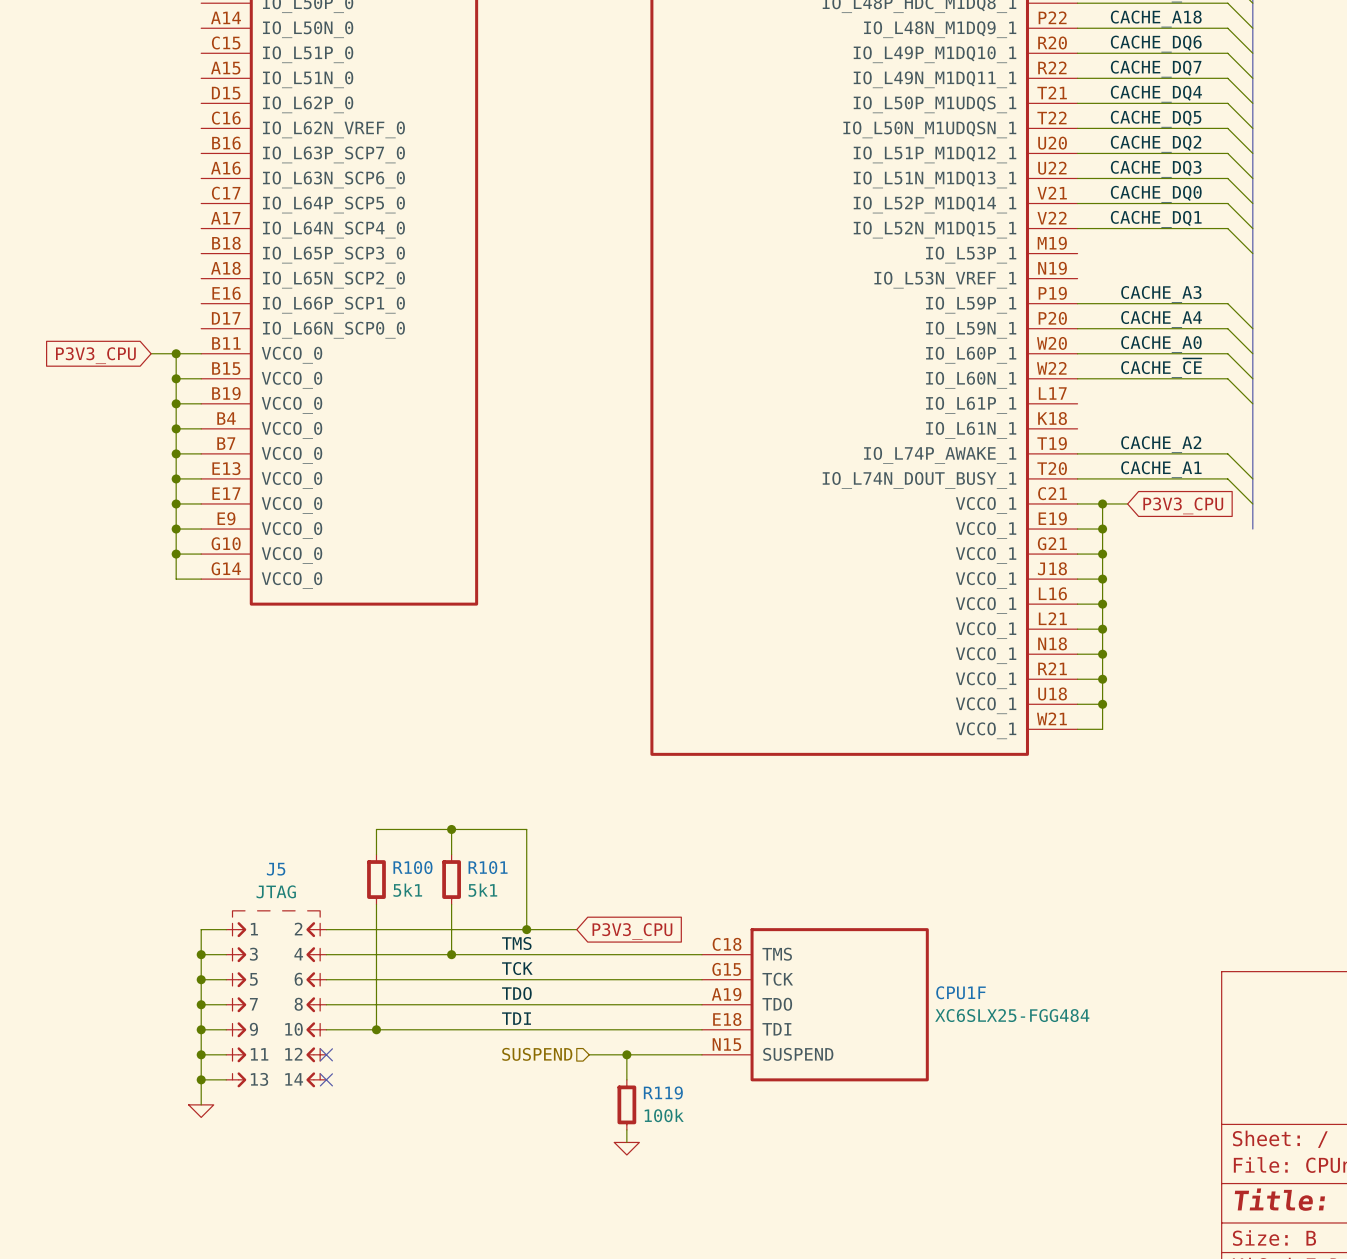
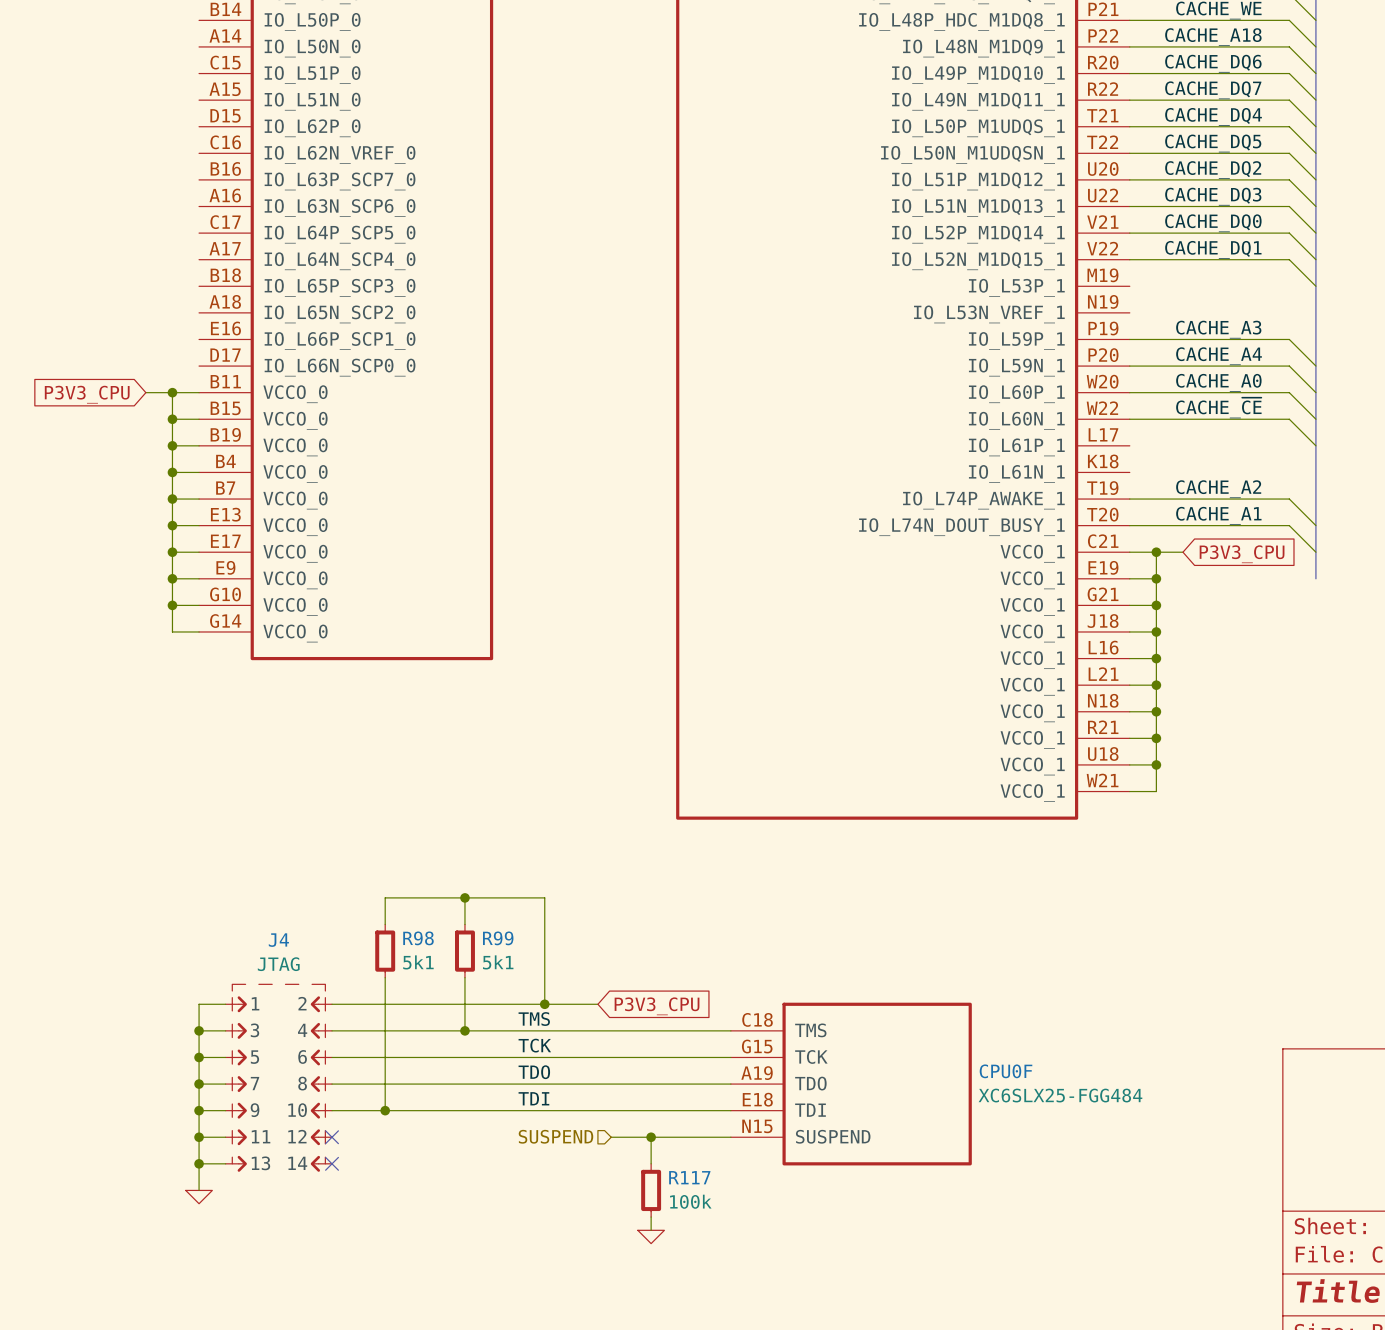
R100 name: R100 (412, 867) -> R98 (418, 938)
R101 name: R101 (488, 867) -> R99 (498, 938)
J5 name: J5 (276, 869) -> J4 (278, 940)
CPU1F name: CPU1F (961, 992) -> CPU0F (1006, 1071)
R119 name: R119 (663, 1092) -> R117 (689, 1177)

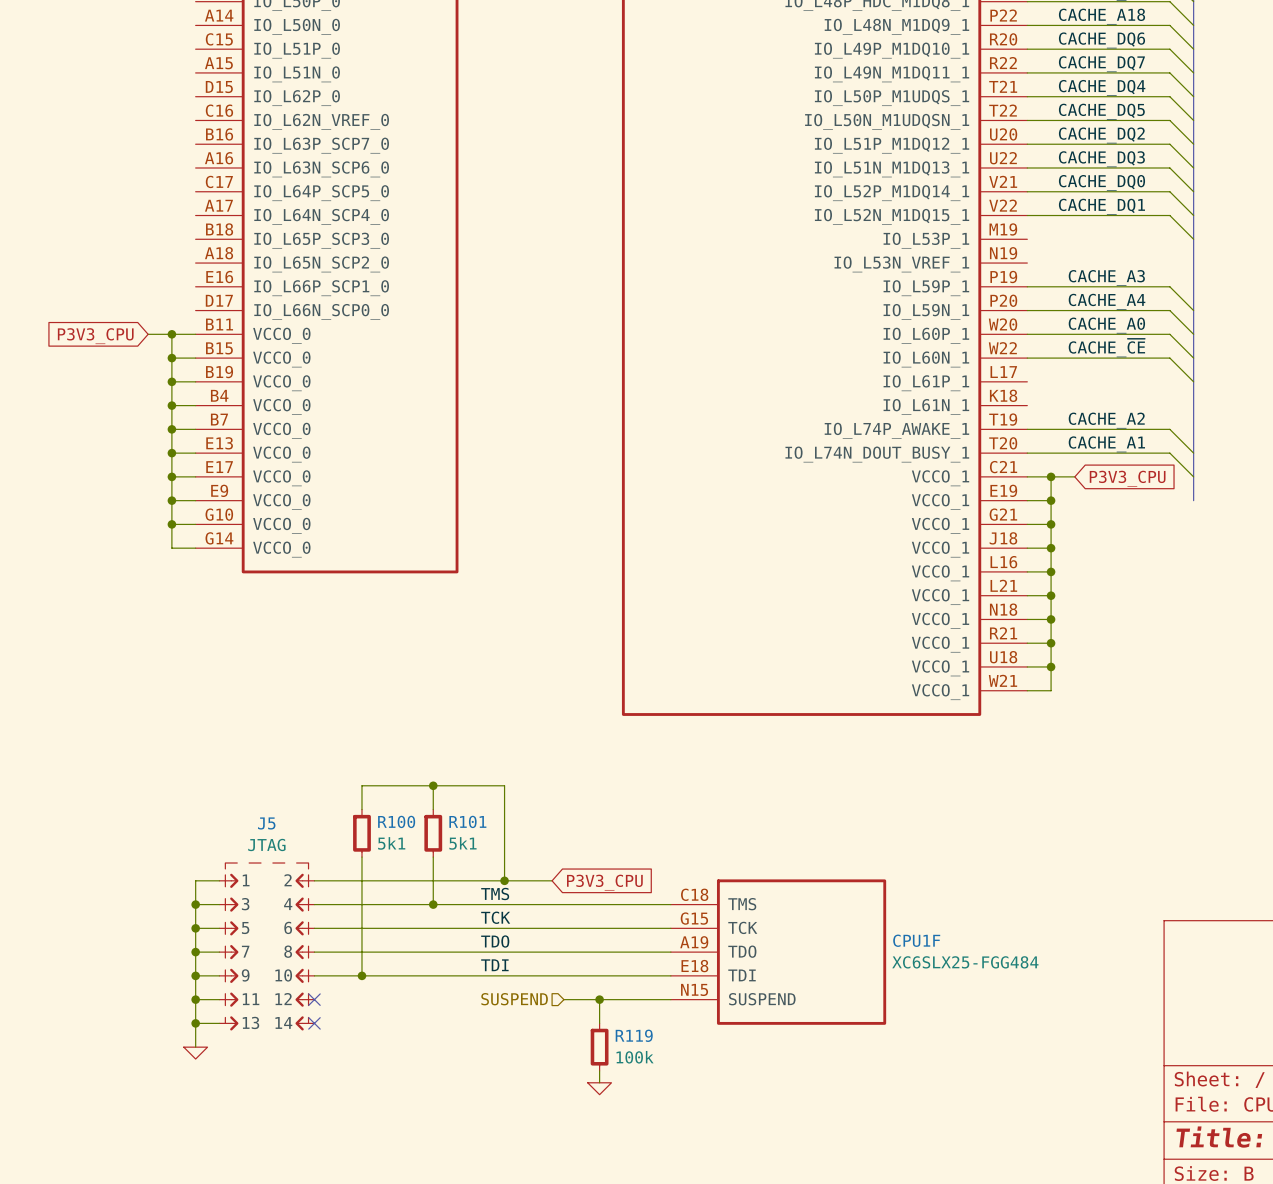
R98 name: R98 (418, 938) -> R100 (396, 821)
R99 name: R99 (498, 938) -> R101 (467, 821)
J4 name: J4 (278, 940) -> J5 (266, 823)
CPU0F name: CPU0F (1006, 1071) -> CPU1F (916, 940)
R117 name: R117 (689, 1177) -> R119 (634, 1035)

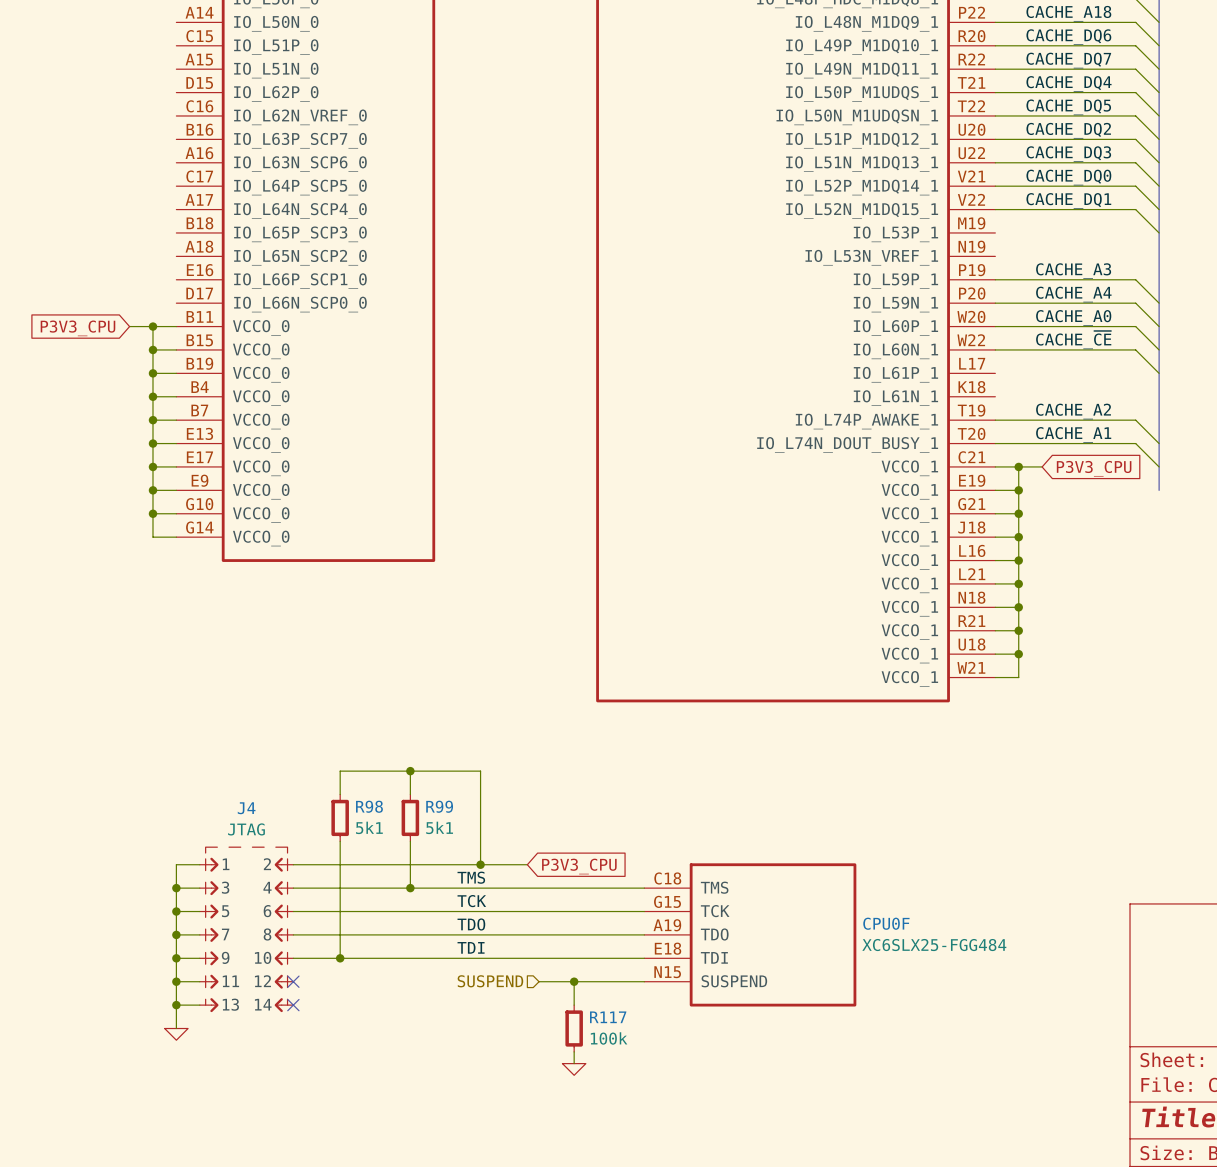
R100 name: R100 (396, 821) -> R98 (369, 806)
R101 name: R101 (467, 821) -> R99 (439, 806)
J5 name: J5 (266, 823) -> J4 (246, 808)
CPU1F name: CPU1F (916, 940) -> CPU0F (886, 923)
R119 name: R119 (634, 1035) -> R117 (608, 1017)

